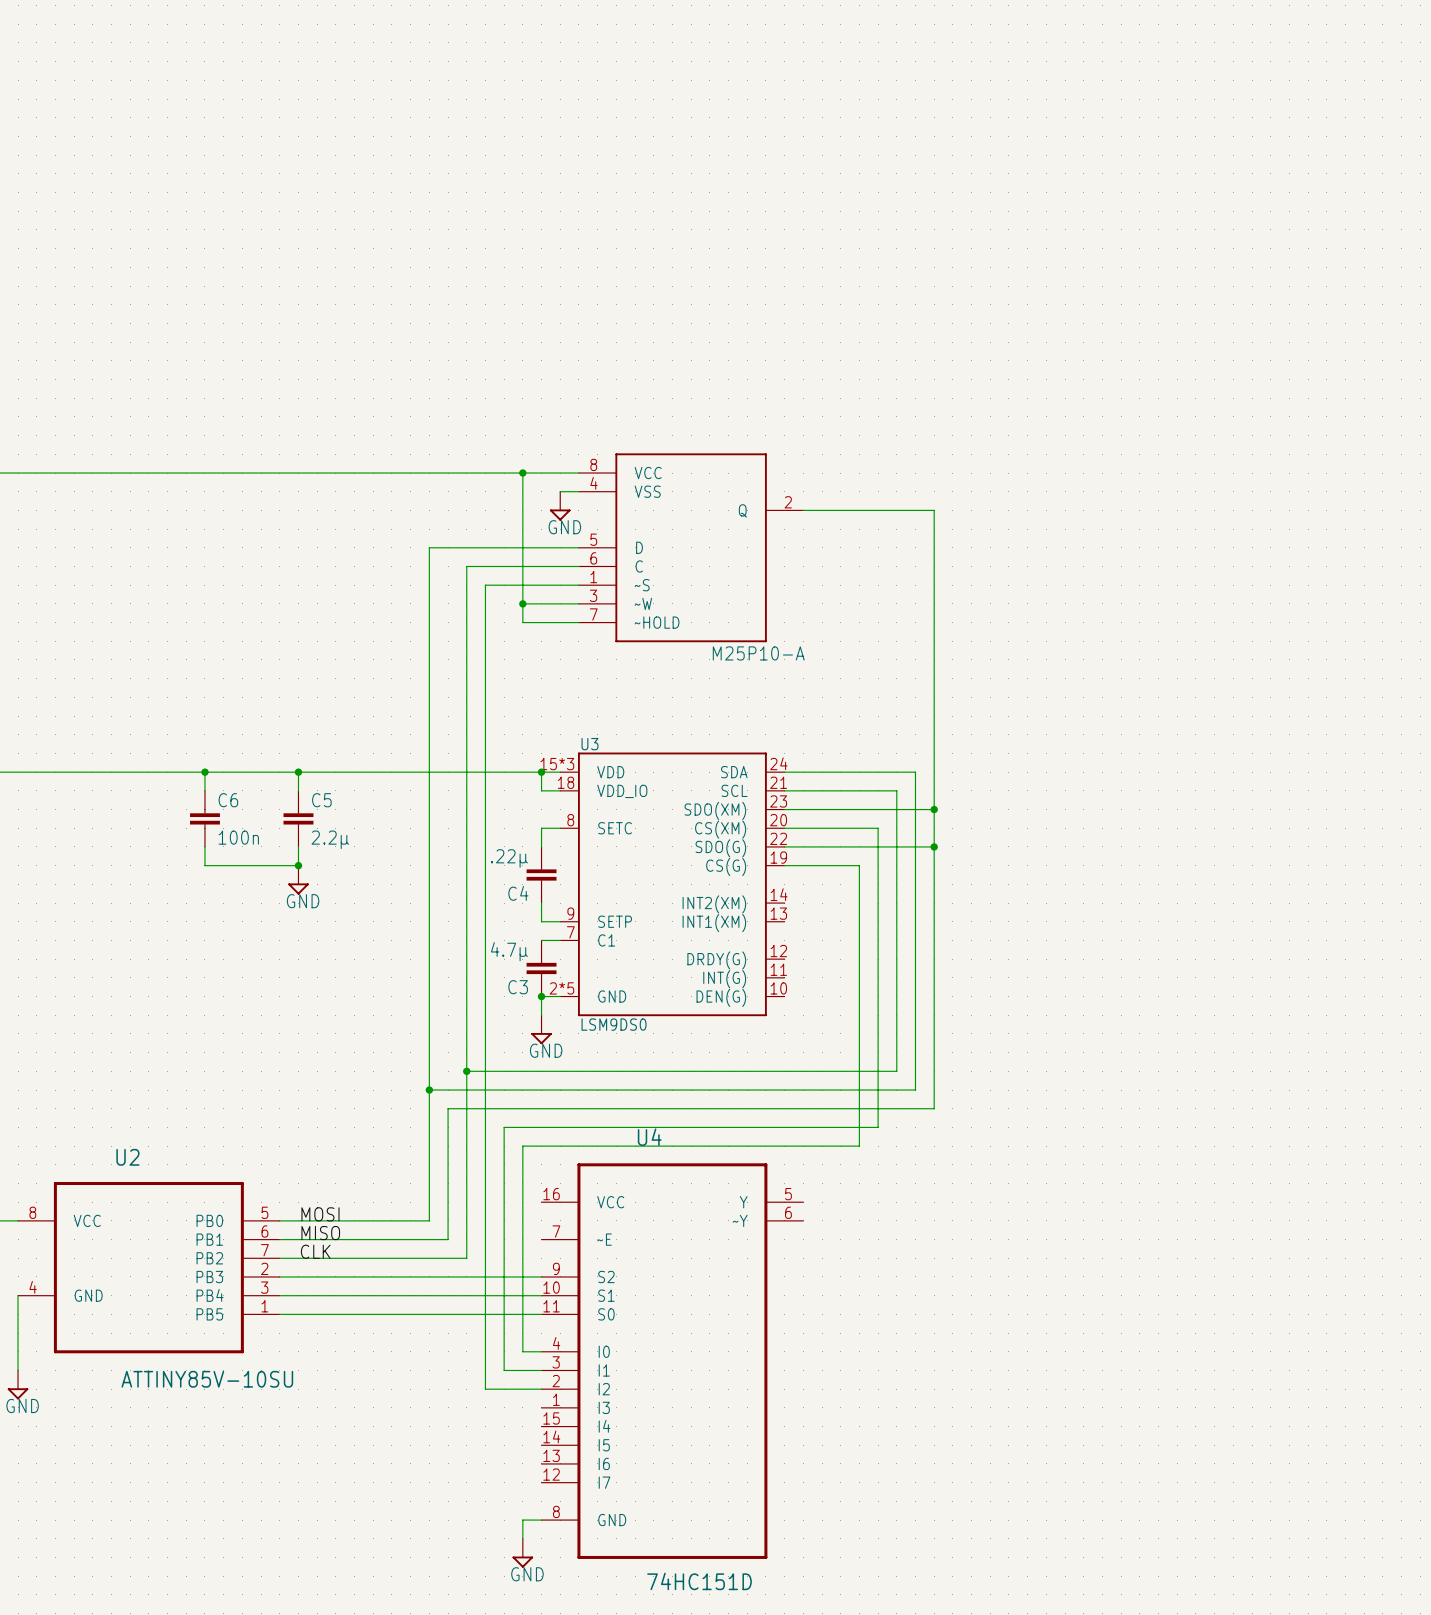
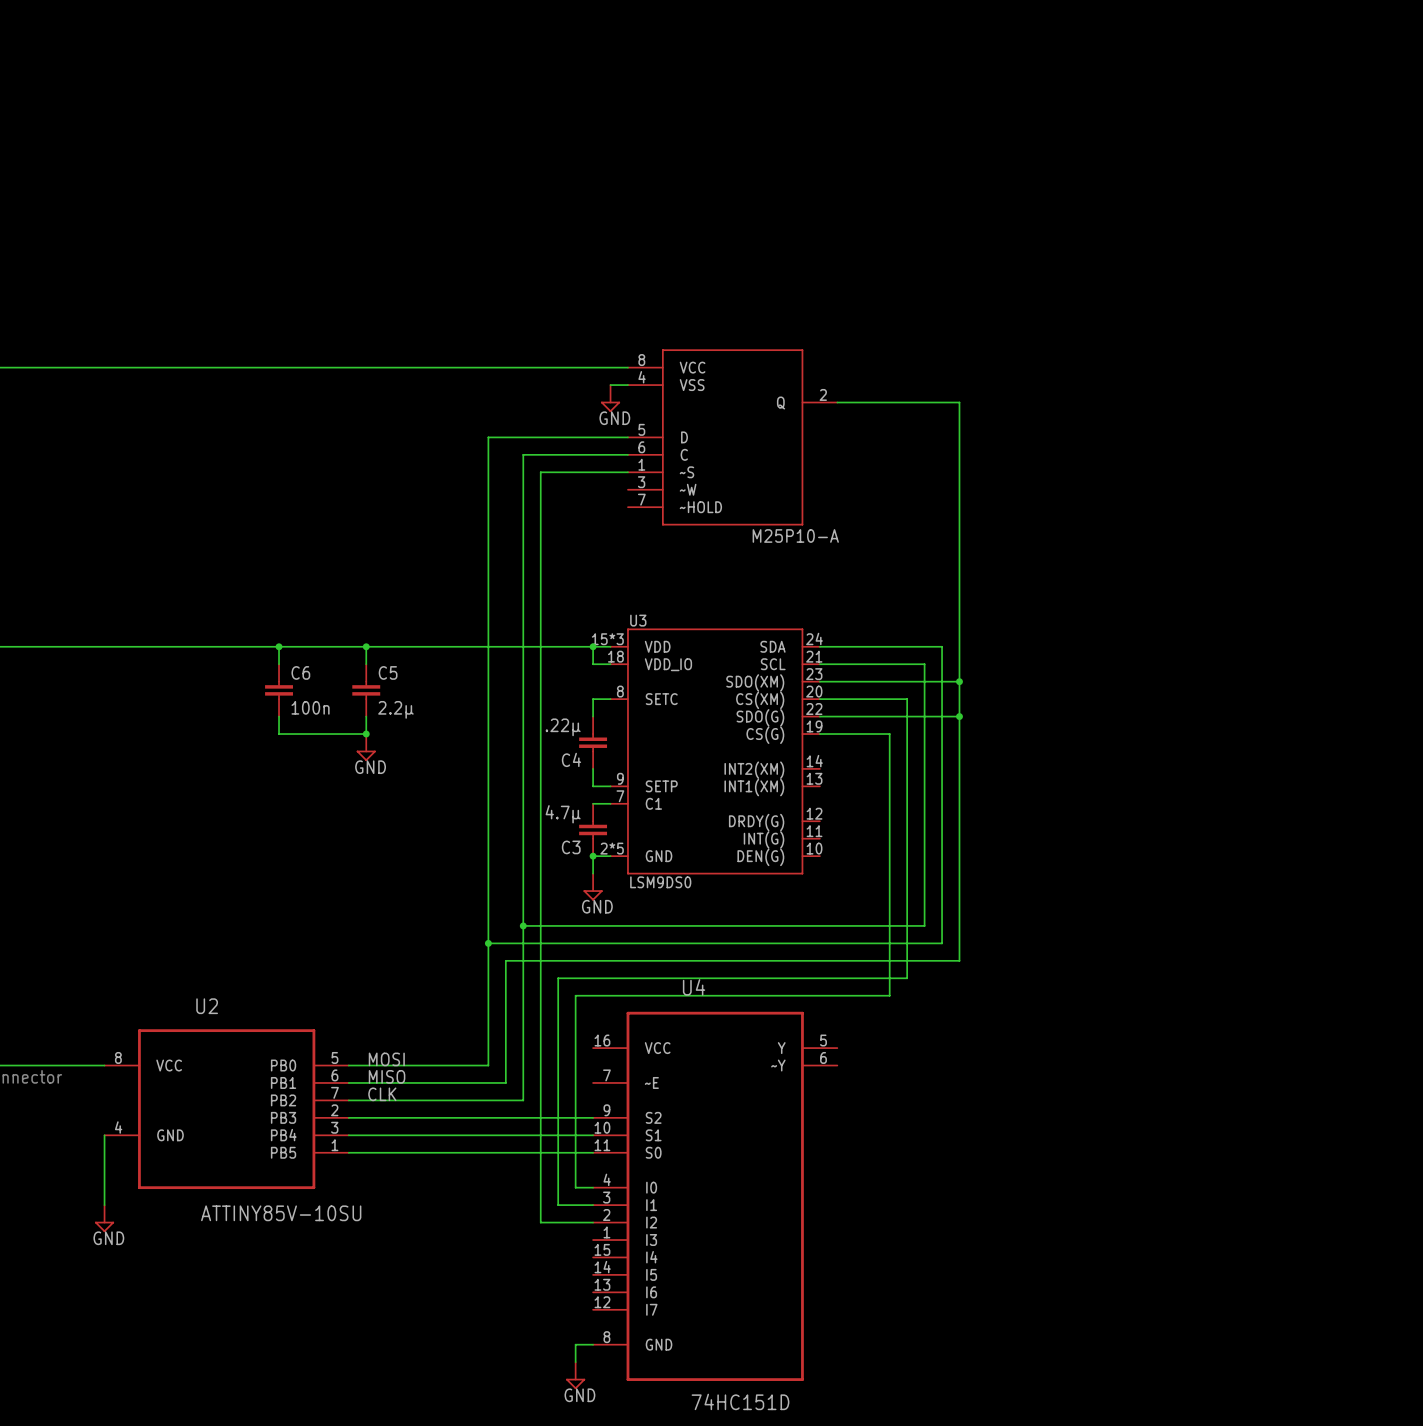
wire: (522, 473) (522, 622) (578, 622) -> none
junction: (522, 473) -> none
wire: (522, 603) (578, 603) -> none
junction: (522, 603) -> none

